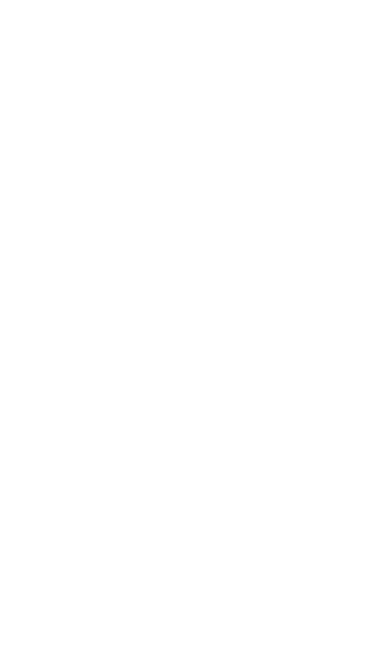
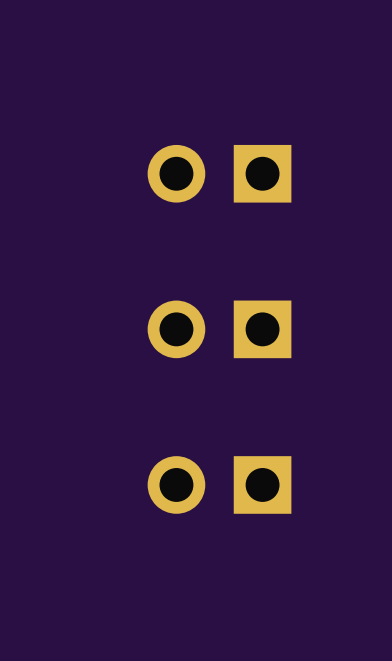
part: none -> (219, 173)
part: none -> (219, 329)
part: none -> (219, 484)

